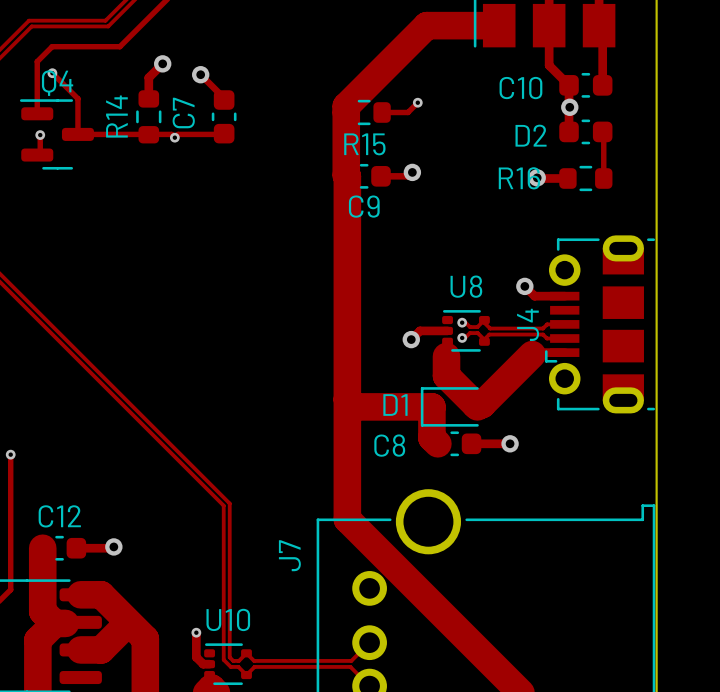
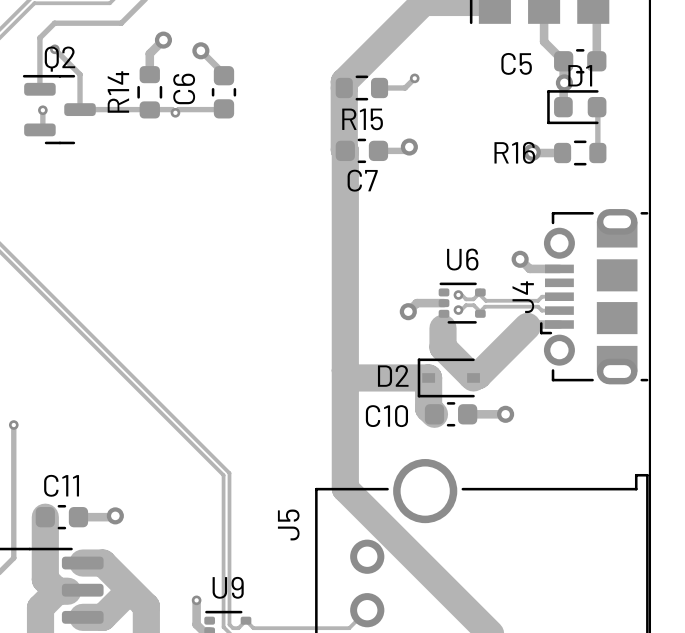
Q4 name: Q4 (57, 83) -> Q2 (59, 59)
C10 name: C10 (520, 88) -> C5 (516, 63)
C7 name: C7 (183, 113) -> C6 (184, 88)
D1: none -> (576, 107)
D2: (585, 131) -> none
C9 name: C9 (364, 206) -> C7 (362, 180)
U8 name: U8 (466, 286) -> U6 (462, 259)
D1 name: D1 (395, 405) -> D2 (393, 375)
C8 name: C8 (389, 445) -> C10 (386, 416)
C12 name: C12 (59, 516) -> C11 (61, 485)
J7 name: J7 (289, 555) -> J5 (288, 524)
U10 name: U10 (228, 619) -> U9 (228, 587)

